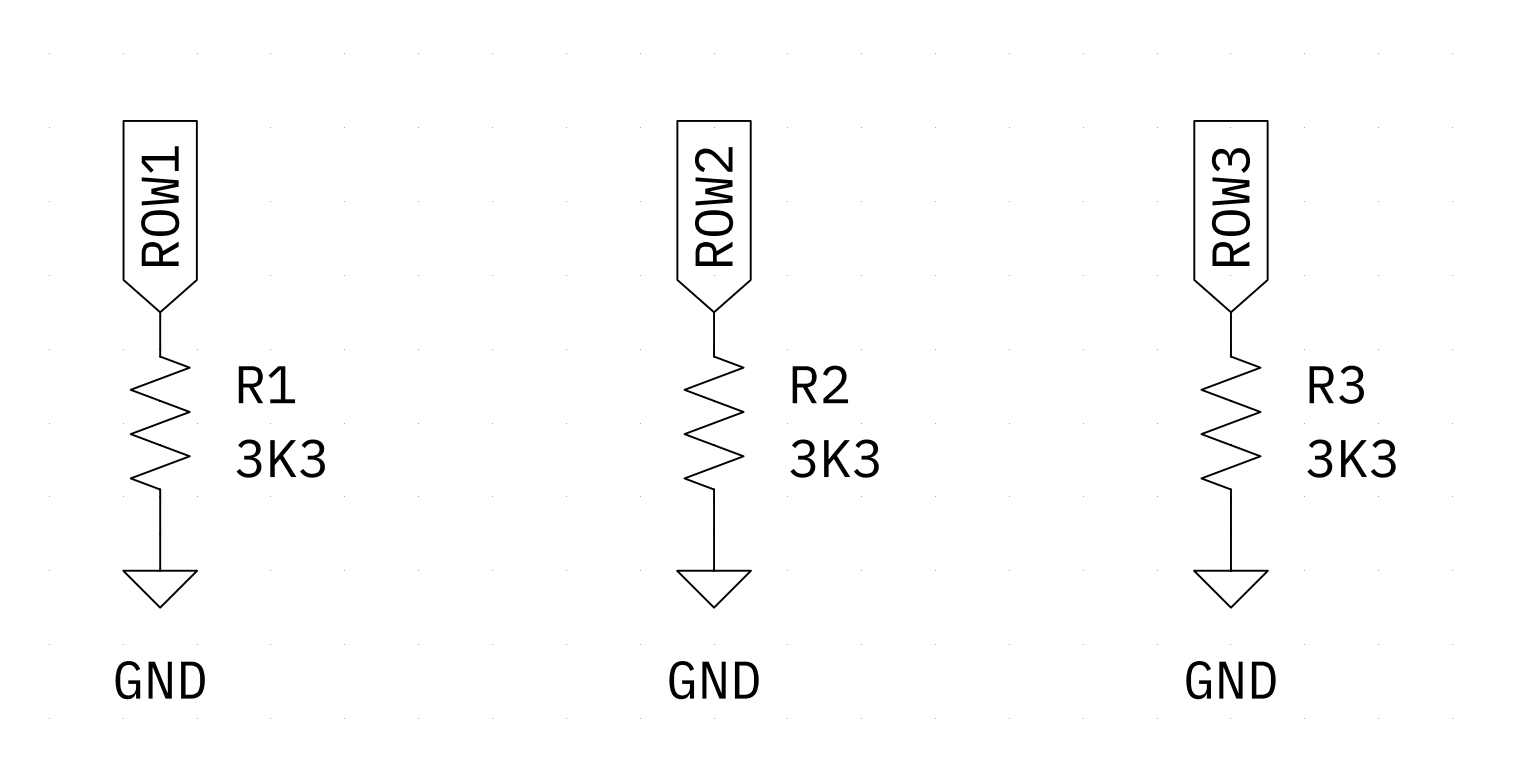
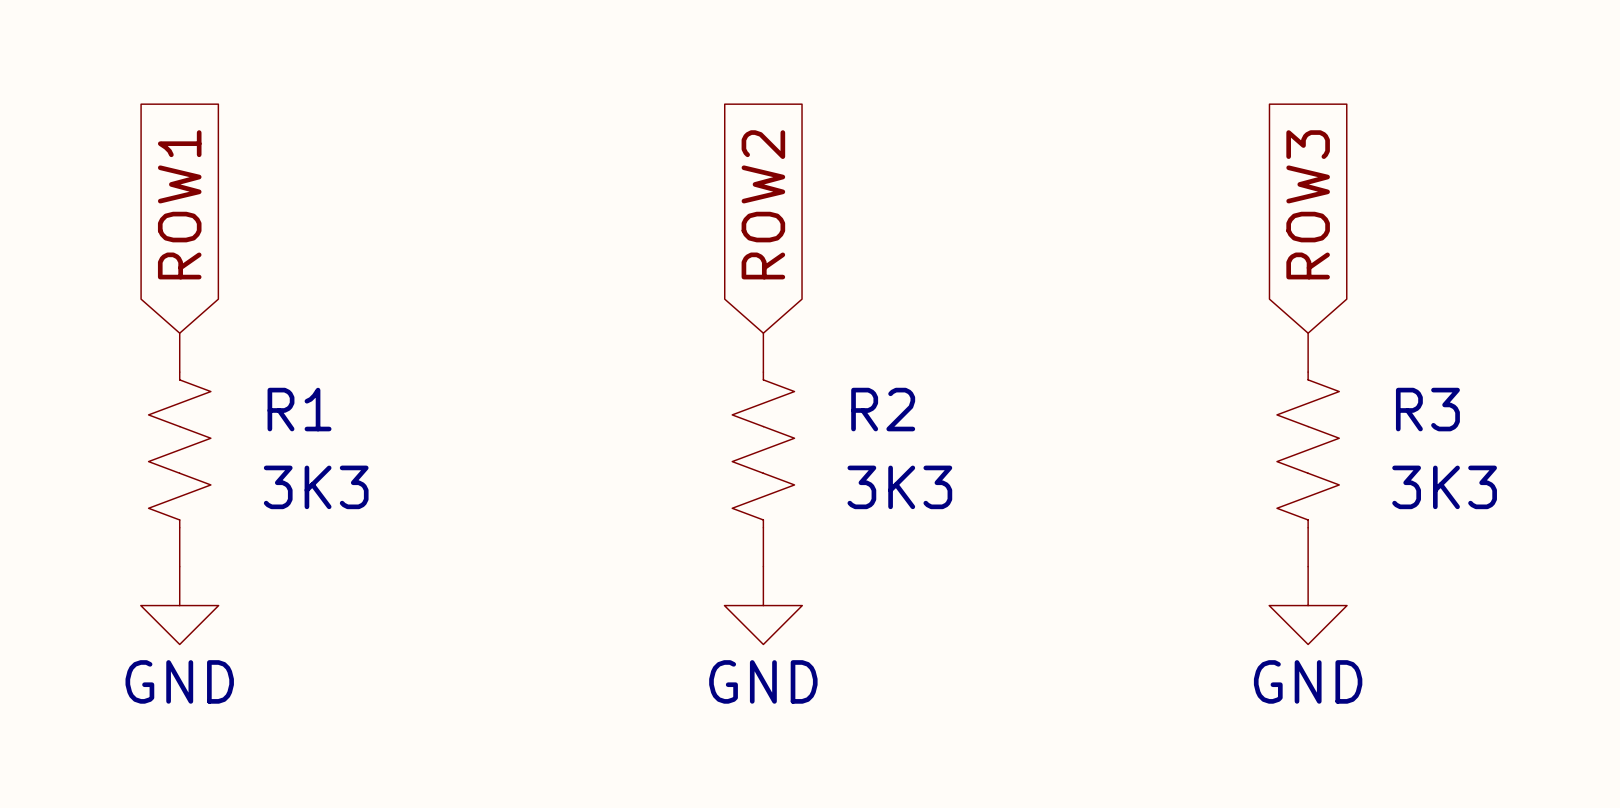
power symbol text position: GND (160, 680) -> GND (179, 681)
power symbol text position: GND (714, 680) -> GND (763, 681)
power symbol text position: GND (1230, 680) -> GND (1308, 681)

